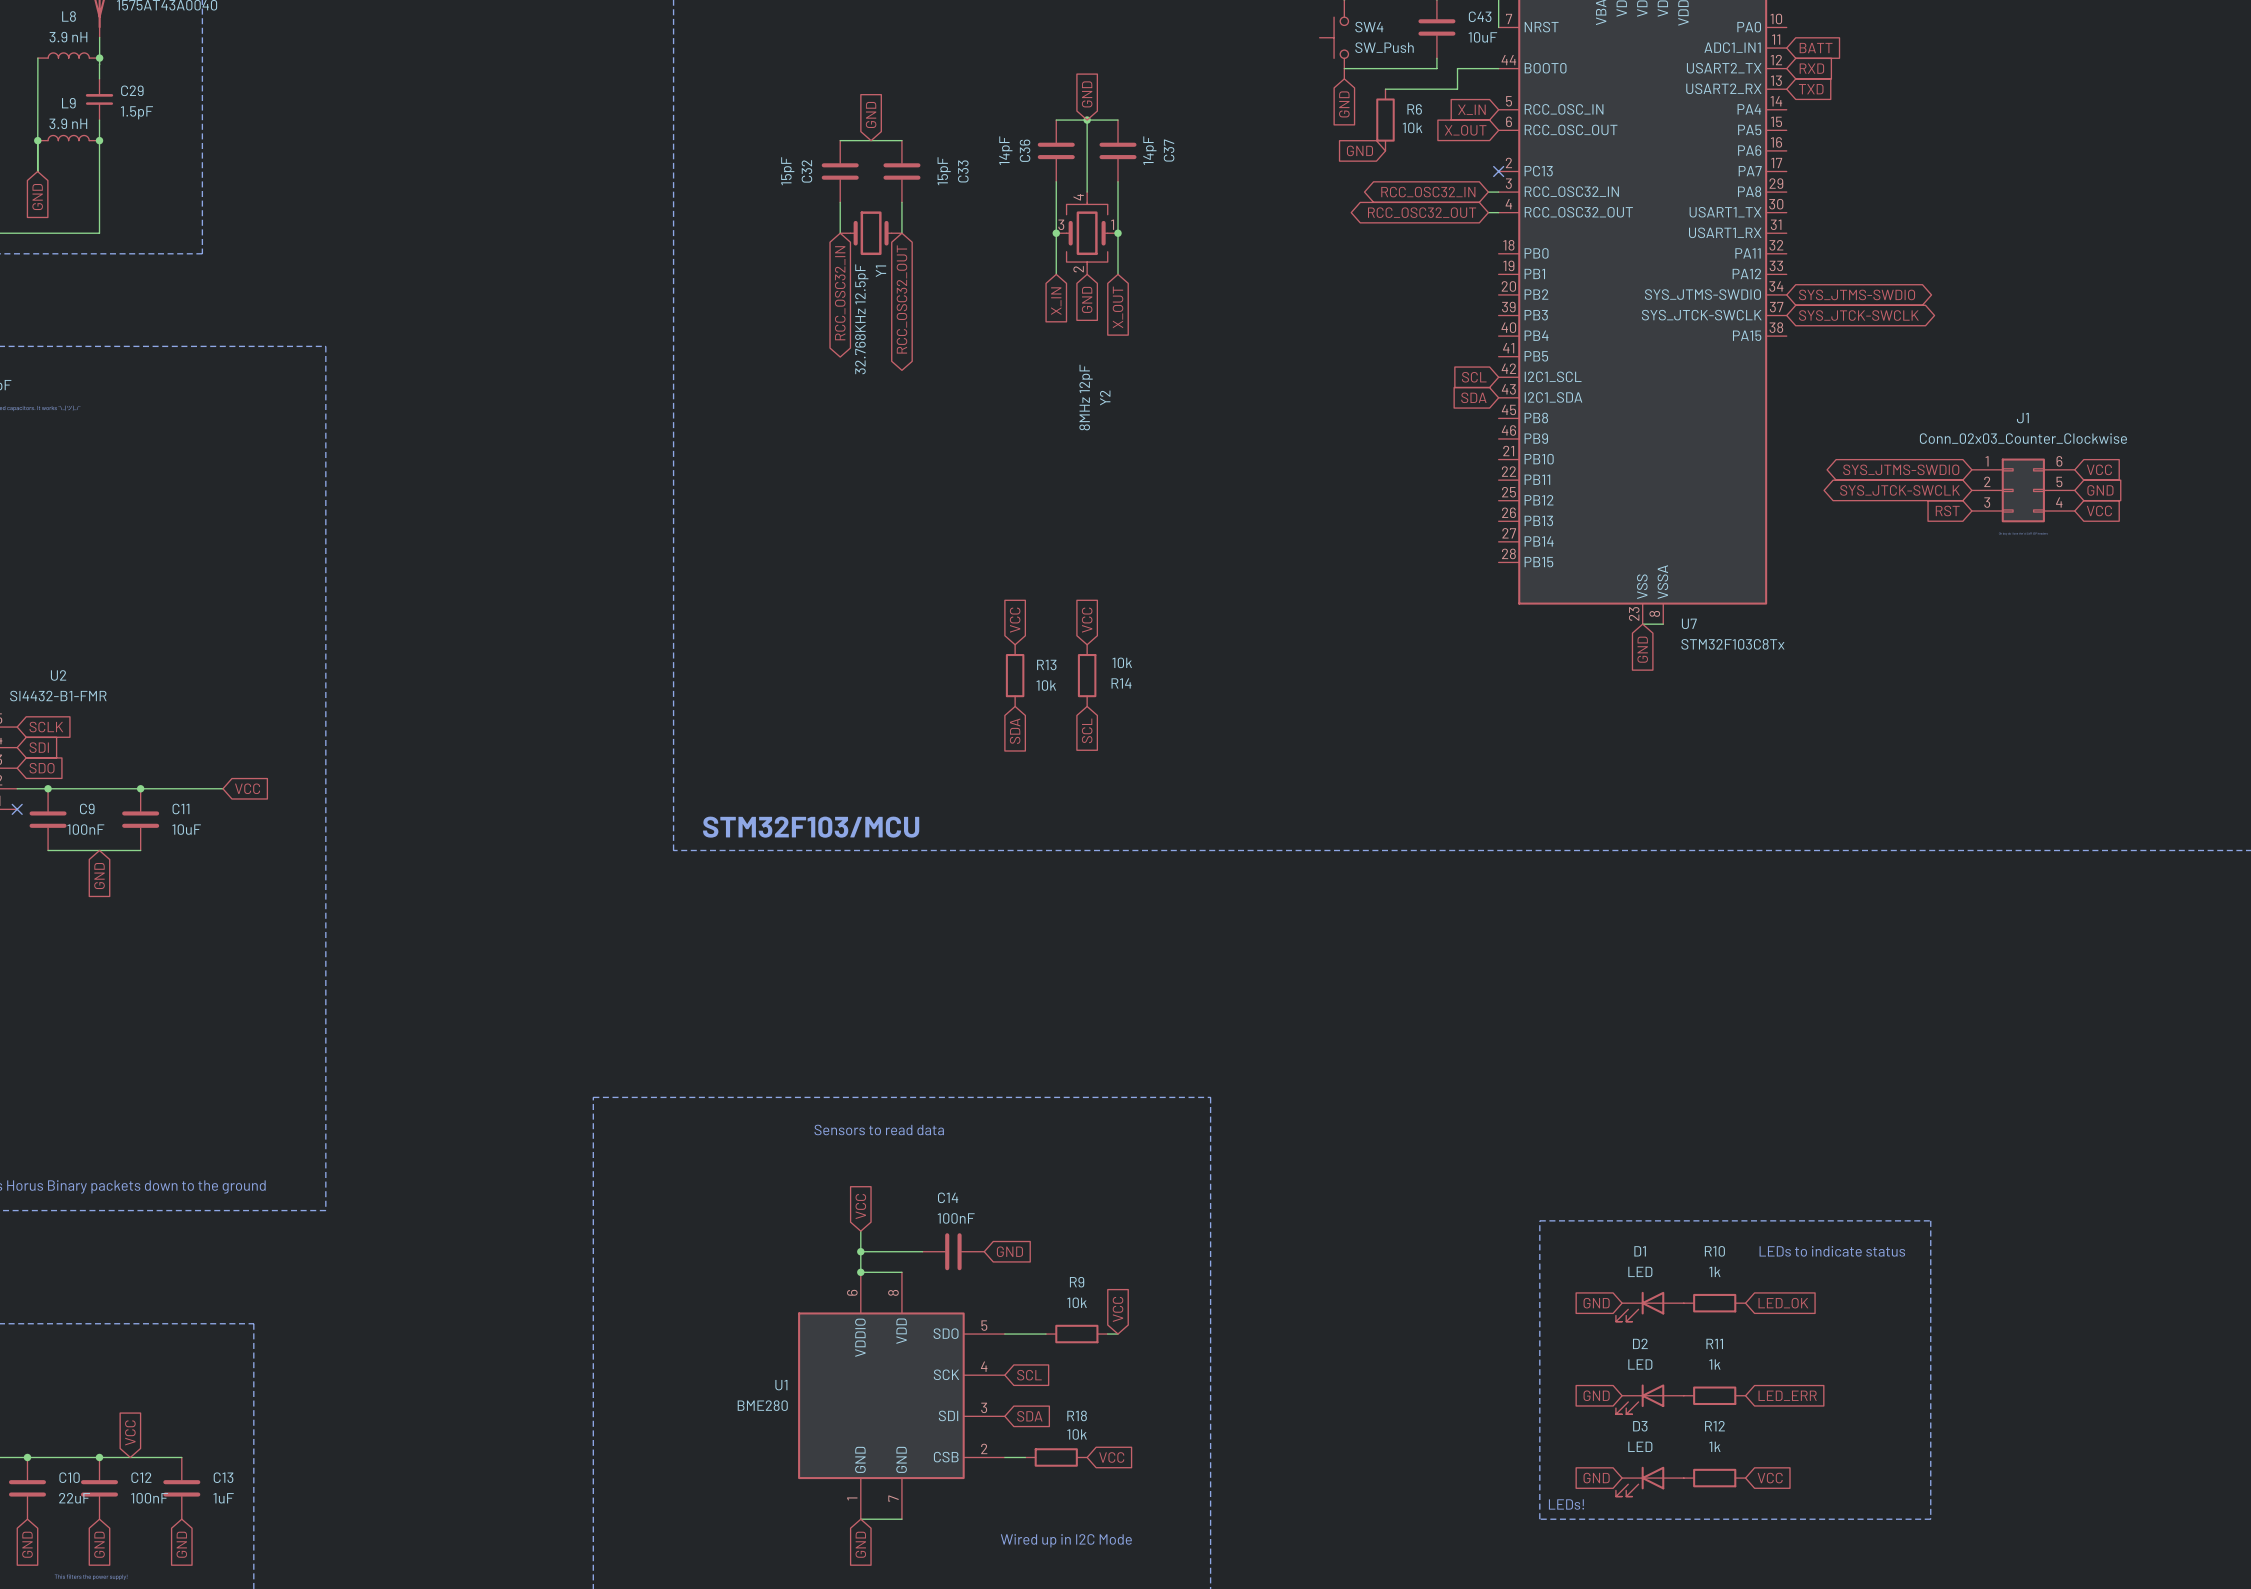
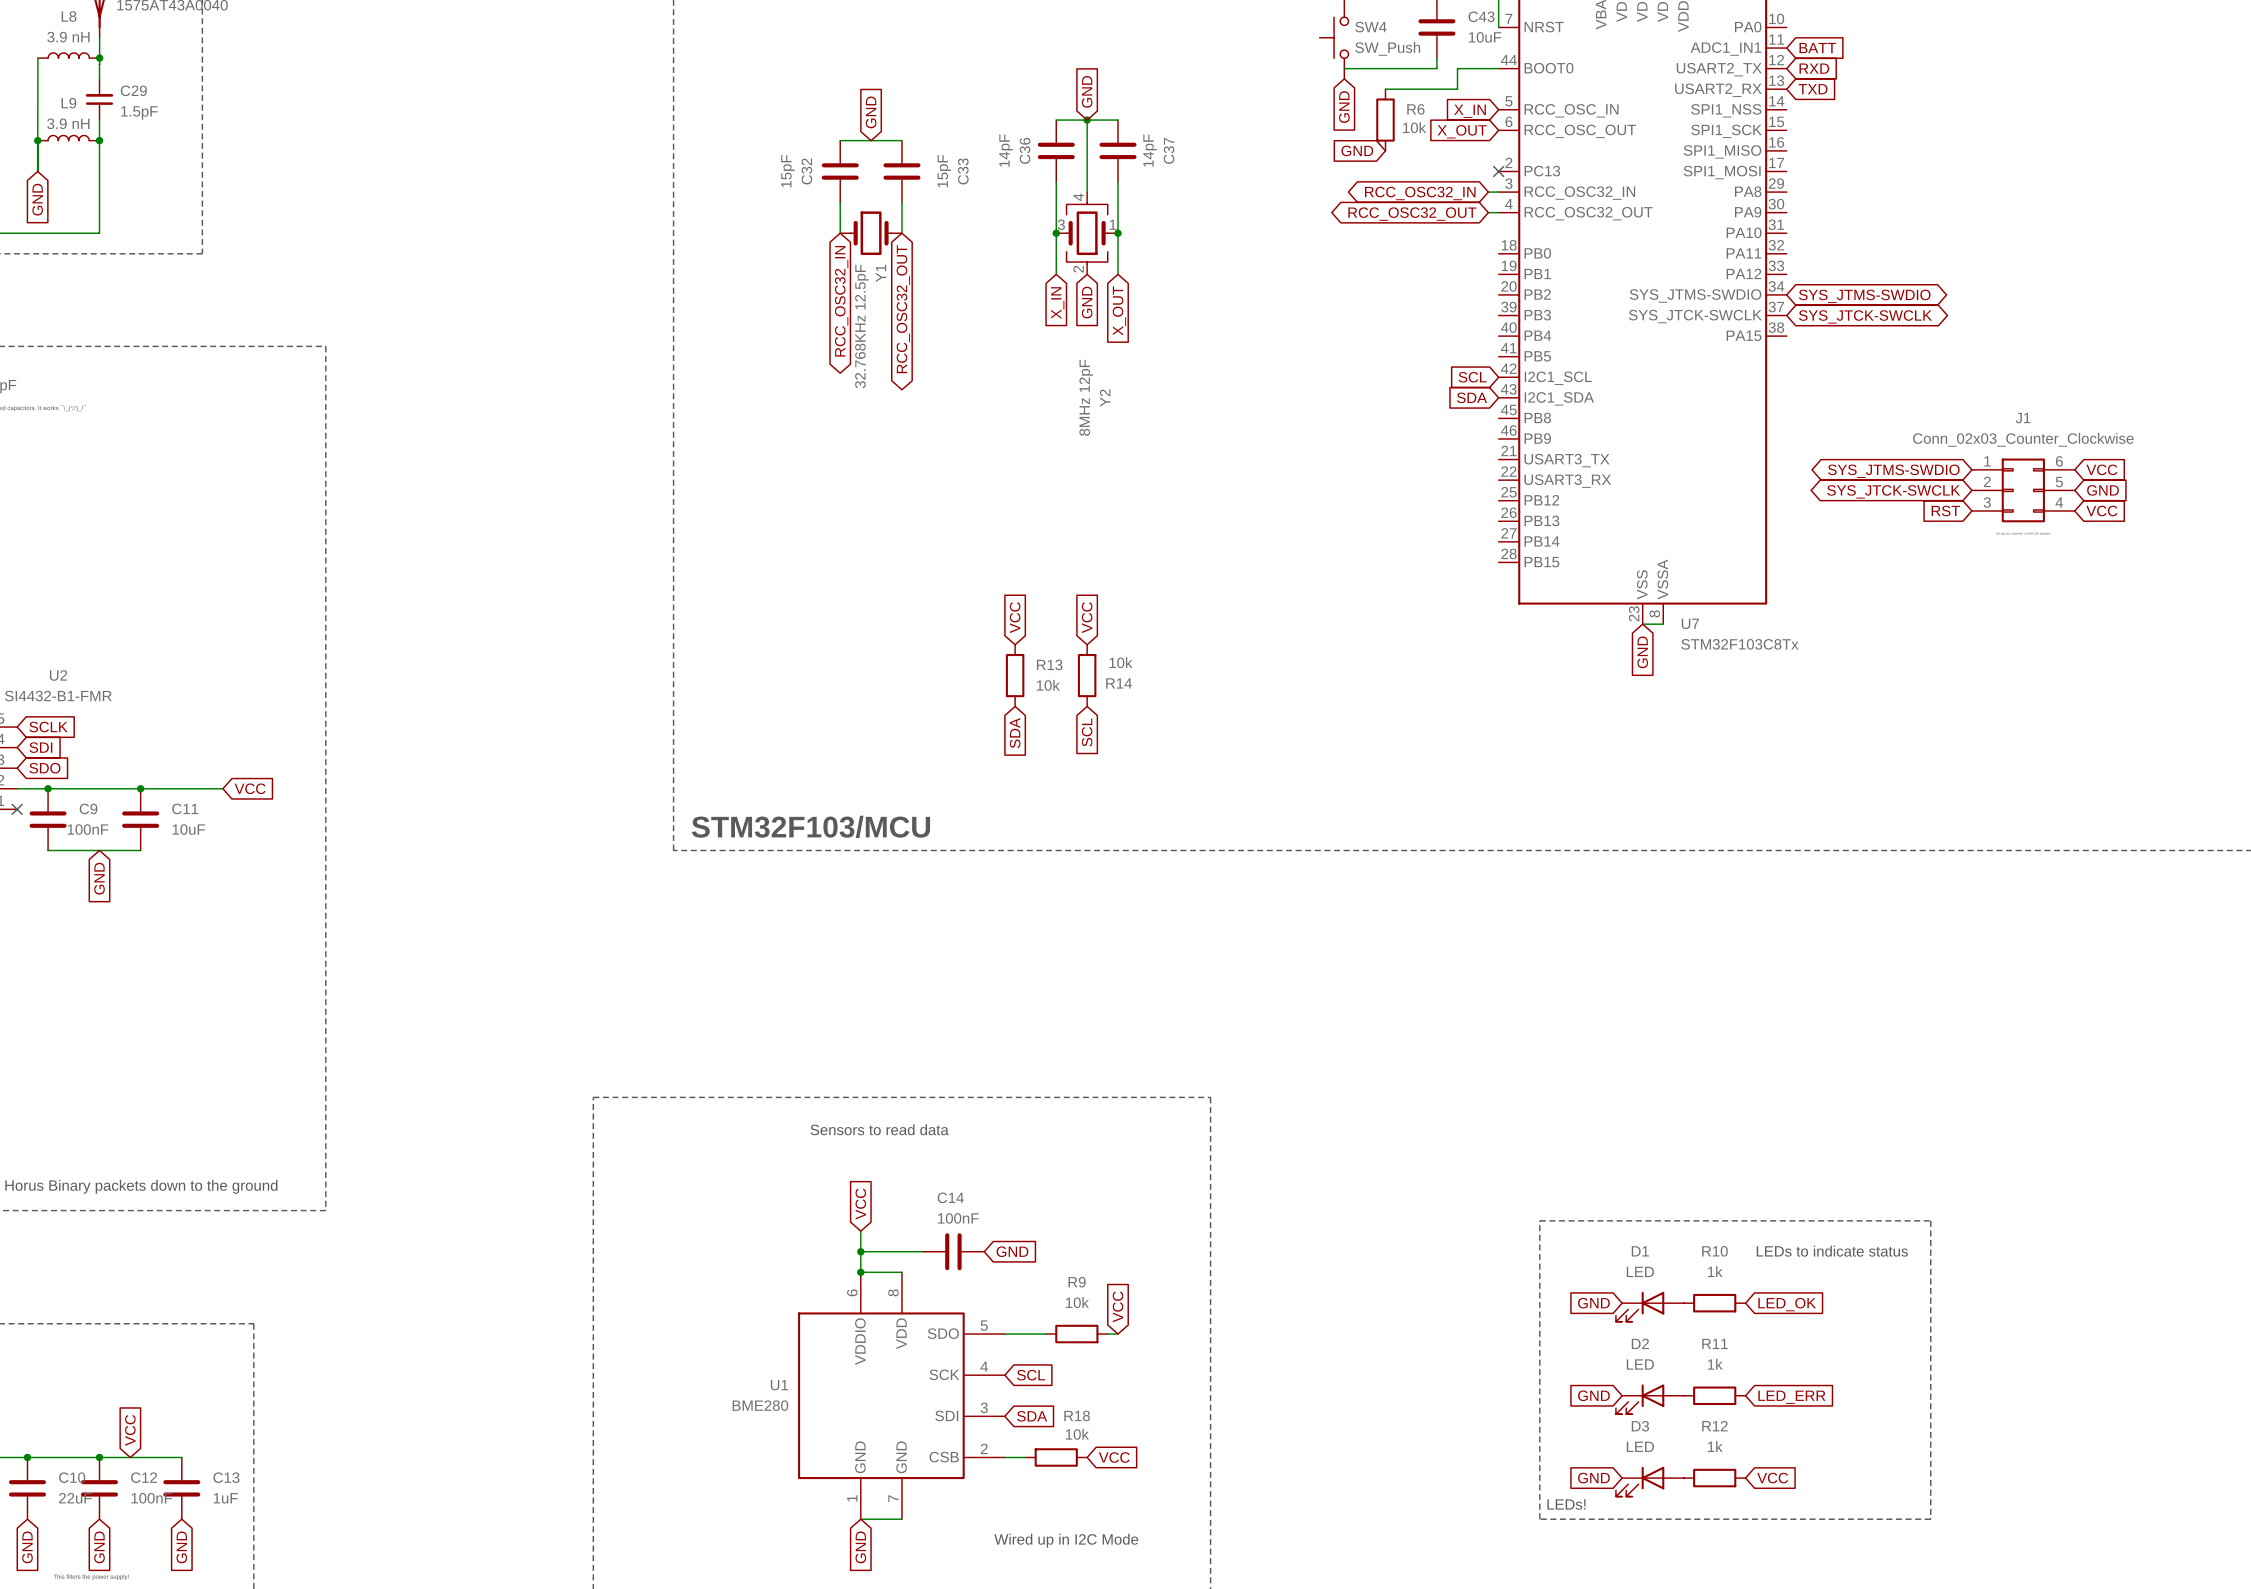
U7 pin name: PA4 (1749, 109) -> SPI1_NSS (1726, 110)
U7 pin name: PA5 (1749, 130) -> SPI1_SCK (1726, 131)
U7 pin name: PA6 (1749, 150) -> SPI1_MISO (1722, 151)
U7 pin name: PA7 (1750, 171) -> SPI1_MOSI (1722, 172)
U7 pin name: USART1_TX (1725, 212) -> PA9 (1748, 212)
U7 pin name: USART1_RX (1725, 232) -> PA10 (1744, 232)
U7 pin name: PB10 (1539, 459) -> USART3_TX (1566, 460)
U7 pin name: PB11 (1537, 479) -> USART3_RX (1567, 481)

